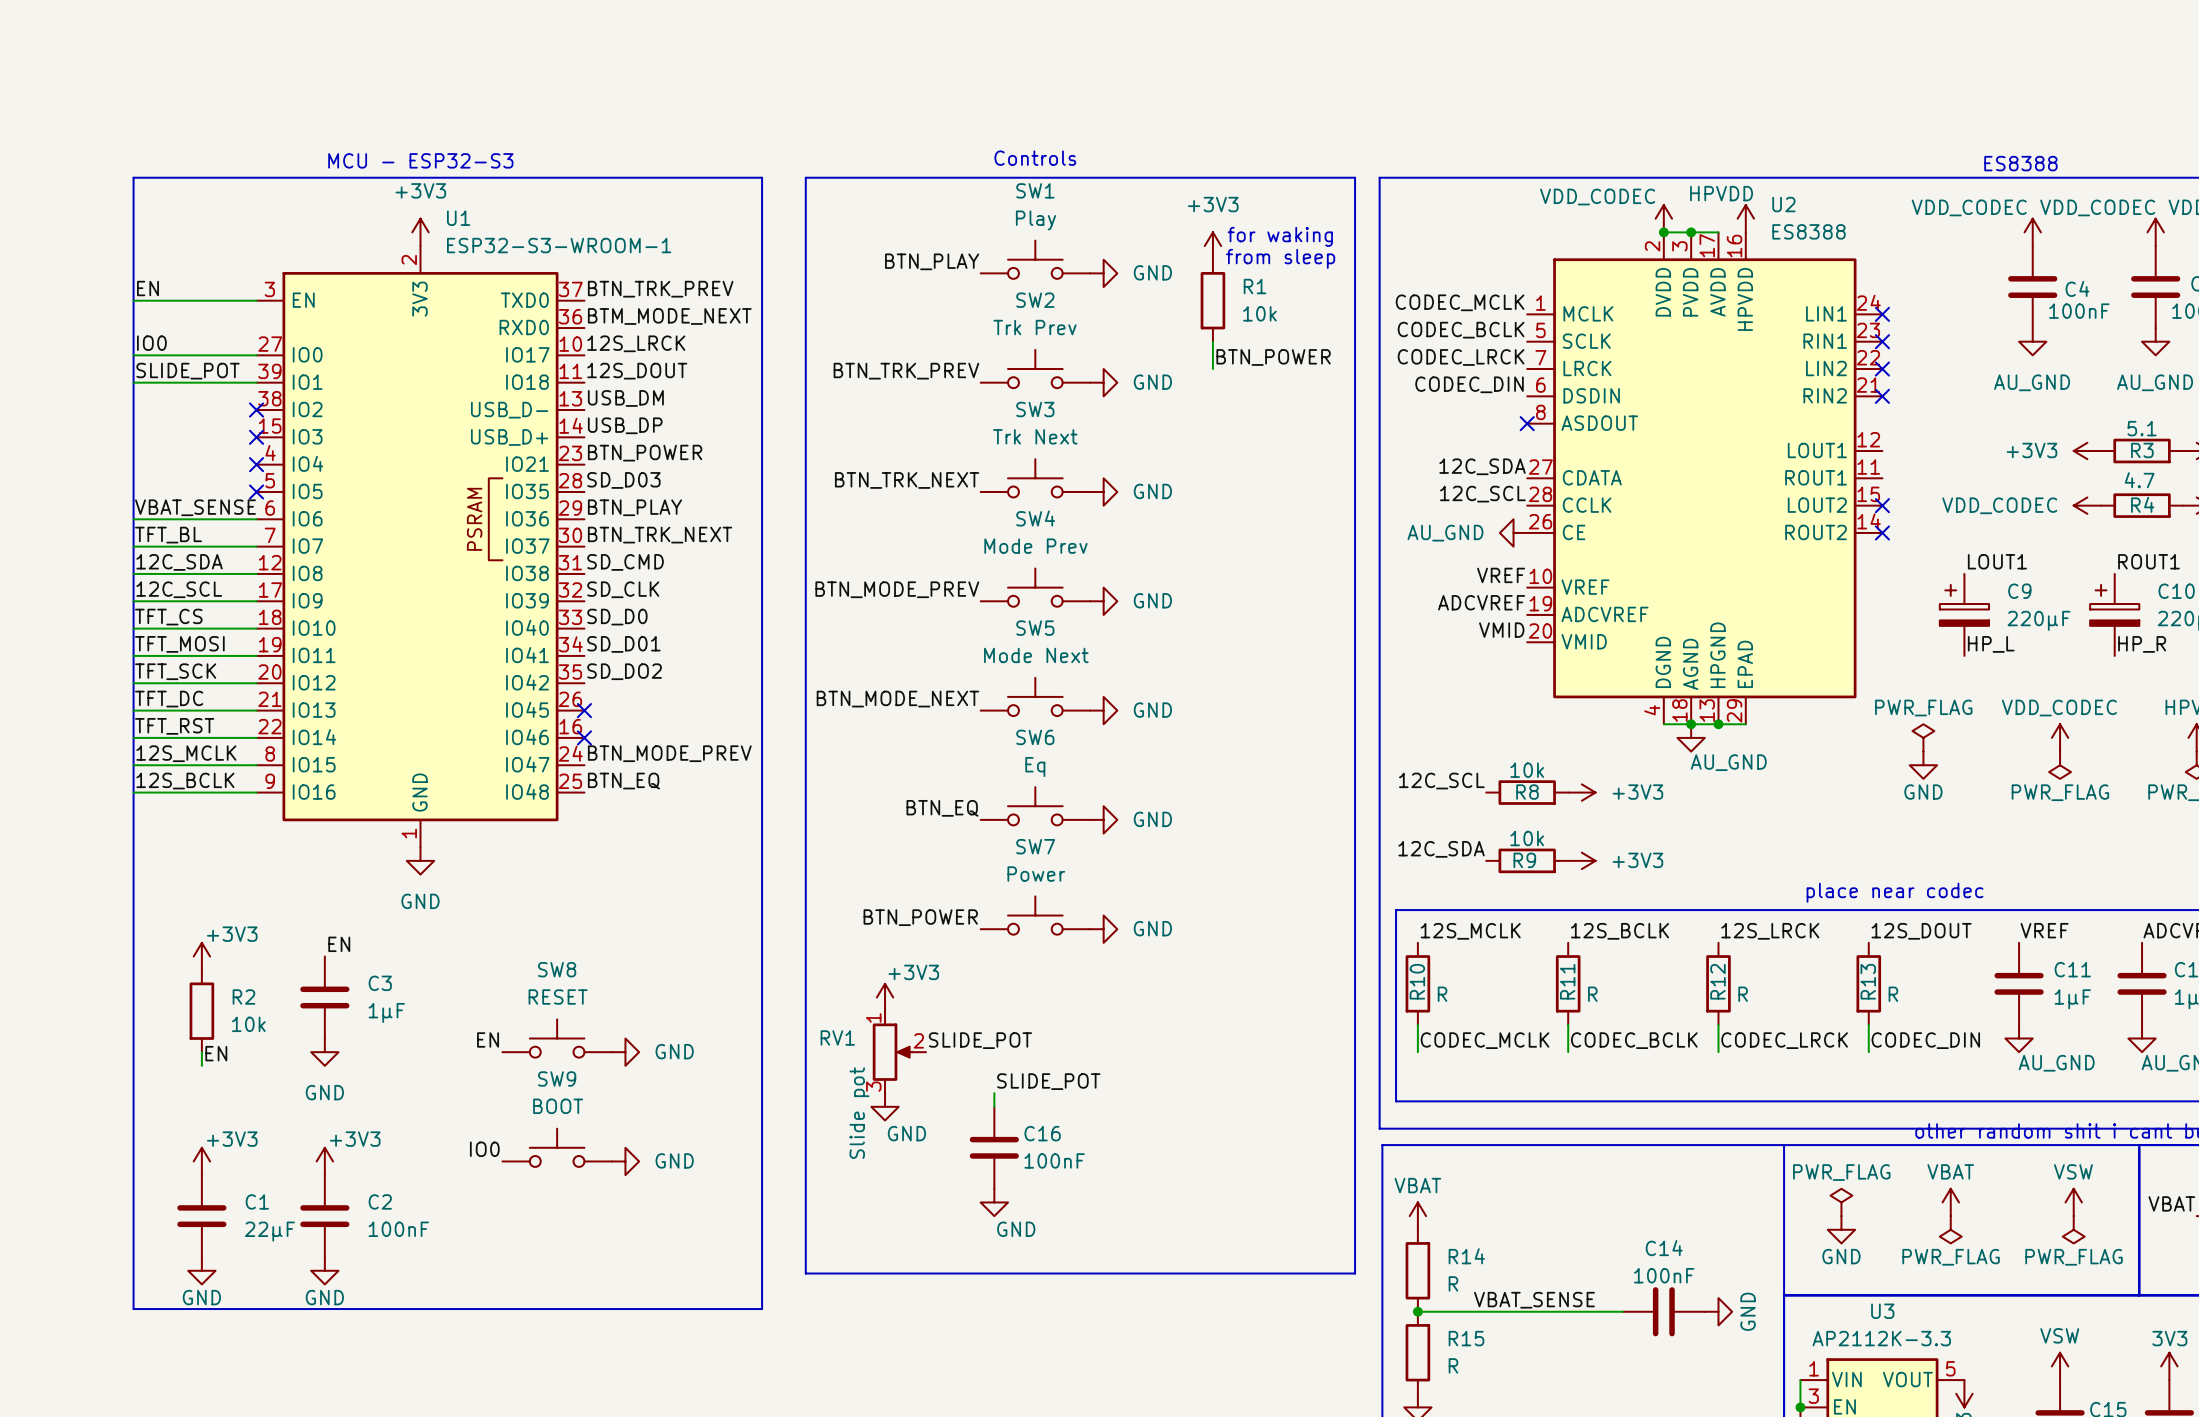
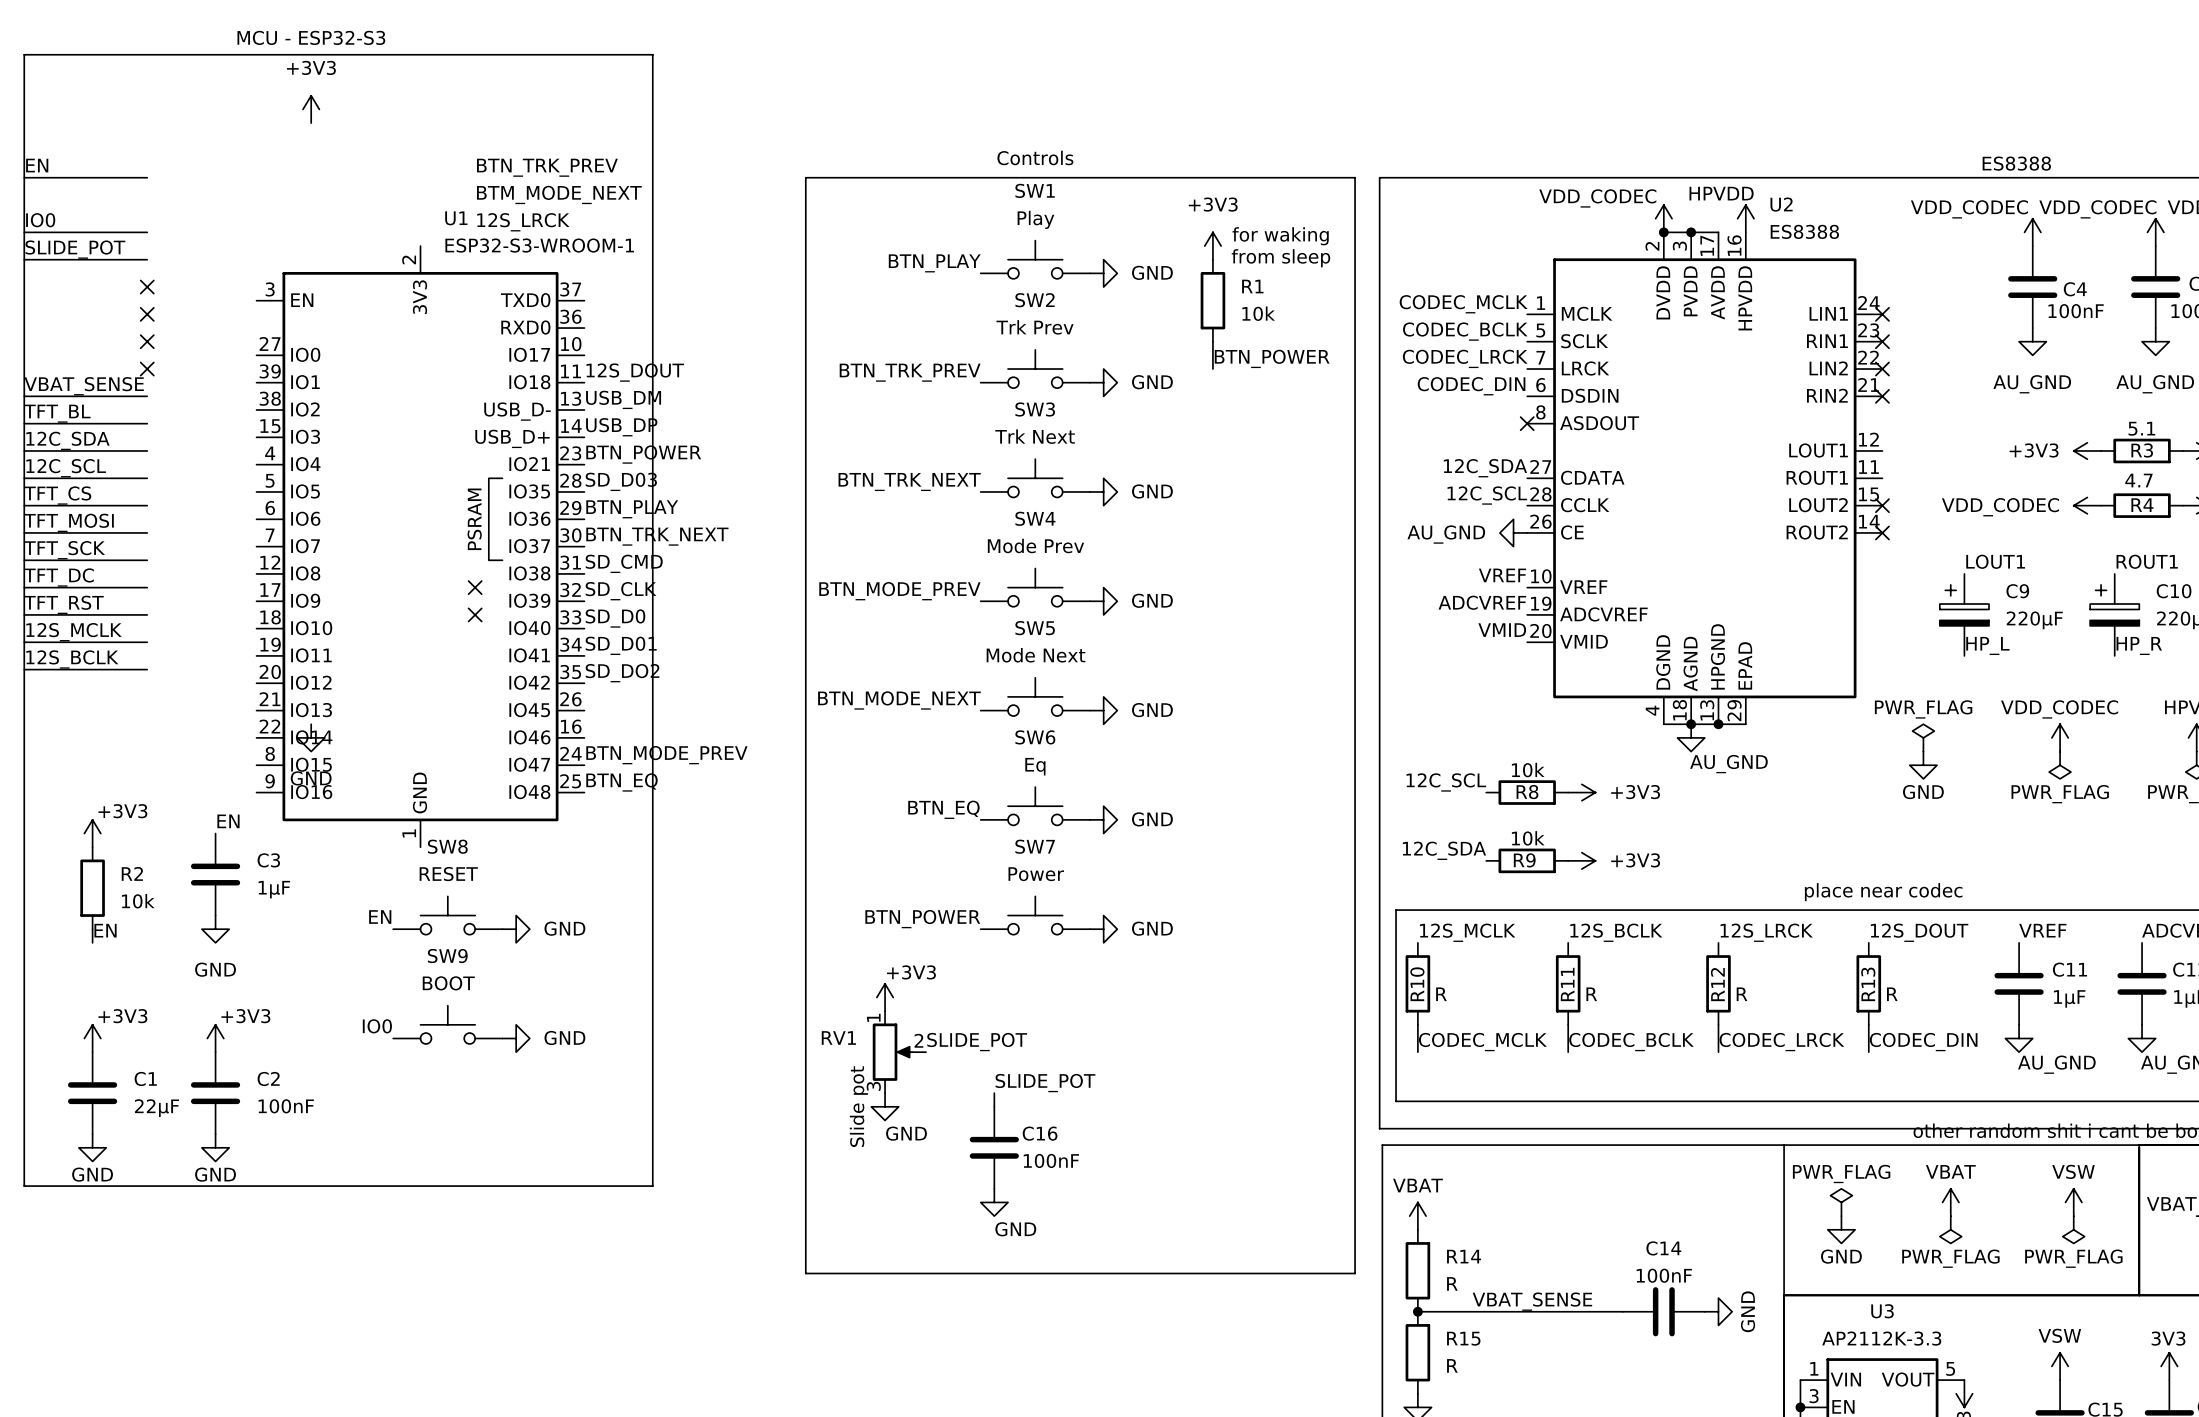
text position: MCU - ESP32-S3 (420, 160) -> MCU - ESP32-S3 (311, 37)
line: (133, 177) (762, 177) (762, 1309) (133, 1309) (133, 177) -> (24, 54) (652, 54) (652, 1186) (24, 1186) (24, 54)
power symbol position: +3V3 (420, 232) -> +3V3 (311, 109)
no-connect mark: none -> (147, 287)
label position: EN (147, 288) -> EN (37, 165)
label position: BTN_TRK_PREV (660, 289) -> BTN_TRK_PREV (547, 167)
wire: (133, 300) (256, 300) -> (24, 177) (147, 177)
no-connect mark: none -> (147, 314)
label position: BTM_MODE_NEXT (669, 316) -> BTM_MODE_NEXT (559, 194)
no-connect mark: none -> (147, 341)
label position: IO0 (151, 343) -> IO0 (40, 220)
label position: 12S_LRCK (636, 343) -> 12S_LRCK (523, 222)
wire: (133, 355) (256, 355) -> (24, 232) (147, 232)
no-connect mark: none -> (147, 369)
label position: SLIDE_POT (188, 371) -> SLIDE_POT (75, 249)
wire: (133, 382) (256, 382) -> (24, 259) (147, 259)
no-connect mark: (256, 410) -> none
no-connect mark: (256, 437) -> none
no-connect mark: (256, 464) -> none
no-connect mark: (256, 491) -> none
label position: VBAT_SENSE (195, 507) -> VBAT_SENSE (84, 386)
wire: (133, 519) (256, 519) -> (24, 396) (147, 396)
label position: TFT_BL (168, 535) -> TFT_BL (57, 413)
wire: (133, 546) (256, 546) -> (24, 423) (147, 423)
label position: 12C_SDA (179, 562) -> 12C_SDA (67, 440)
wire: (133, 573) (256, 573) -> (24, 450) (147, 450)
no-connect mark: none -> (475, 587)
label position: 12C_SCL (179, 589) -> 12C_SCL (66, 468)
wire: (133, 601) (256, 601) -> (24, 478) (147, 478)
no-connect mark: none -> (475, 614)
label position: TFT_CS (168, 617) -> TFT_CS (57, 495)
wire: (133, 628) (256, 628) -> (24, 505) (147, 505)
label position: TFT_MOSI (179, 644) -> TFT_MOSI (69, 522)
wire: (133, 655) (256, 655) -> (24, 532) (147, 532)
label position: TFT_SCK (175, 671) -> TFT_SCK (64, 550)
wire: (133, 683) (256, 683) -> (24, 560) (147, 560)
label position: TFT_DC (169, 699) -> TFT_DC (59, 577)
wire: (133, 710) (256, 710) -> (24, 587) (147, 587)
no-connect mark: (584, 710) -> none
label position: TFT_RST (174, 726) -> TFT_RST (63, 604)
wire: (133, 737) (256, 737) -> (24, 614) (147, 614)
power symbol: none -> GND (311, 737)
no-connect mark: (584, 737) -> none
label position: 12S_MCLK (186, 753) -> 12S_MCLK (74, 632)
wire: (133, 765) (256, 765) -> (24, 642) (147, 642)
label position: 12S_BCLK (185, 781) -> 12S_BCLK (72, 659)
wire: (133, 792) (256, 792) -> (24, 669) (147, 669)
label: none -> EN (228, 821)
power symbol: none -> +3V3 (92, 833)
power symbol: GND (420, 860) -> none
power symbol: none -> GND (215, 929)
power symbol: none -> GND (516, 929)
label: none -> EN (105, 930)
label position: EN (339, 944) -> EN (380, 917)
power symbol: +3V3 (201, 956) -> none
C3 position: (324, 997) -> (215, 874)
R2 position: (201, 1011) -> (92, 888)
power symbol: none -> +3V3 (92, 1038)
power symbol: none -> +3V3 (215, 1038)
power symbol: none -> GND (516, 1038)
SW8 position: (557, 1038) -> (447, 915)
label: EN (488, 1039) -> none
wire: (201, 1052) (201, 1065) -> (92, 929) (92, 942)
power symbol: GND (324, 1052) -> none
power symbol: GND (625, 1052) -> none
label: EN (216, 1053) -> none
power symbol: none -> GND (92, 1147)
power symbol: none -> GND (215, 1147)
SW9 position: (557, 1147) -> (447, 1024)
label position: IO0 (484, 1149) -> IO0 (377, 1026)
power symbol: +3V3 (201, 1161) -> none
power symbol: +3V3 (324, 1161) -> none
power symbol: GND (625, 1161) -> none
C1 position: (201, 1216) -> (92, 1093)
C2 position: (324, 1216) -> (215, 1093)
power symbol: GND (201, 1270) -> none
power symbol: GND (324, 1270) -> none

